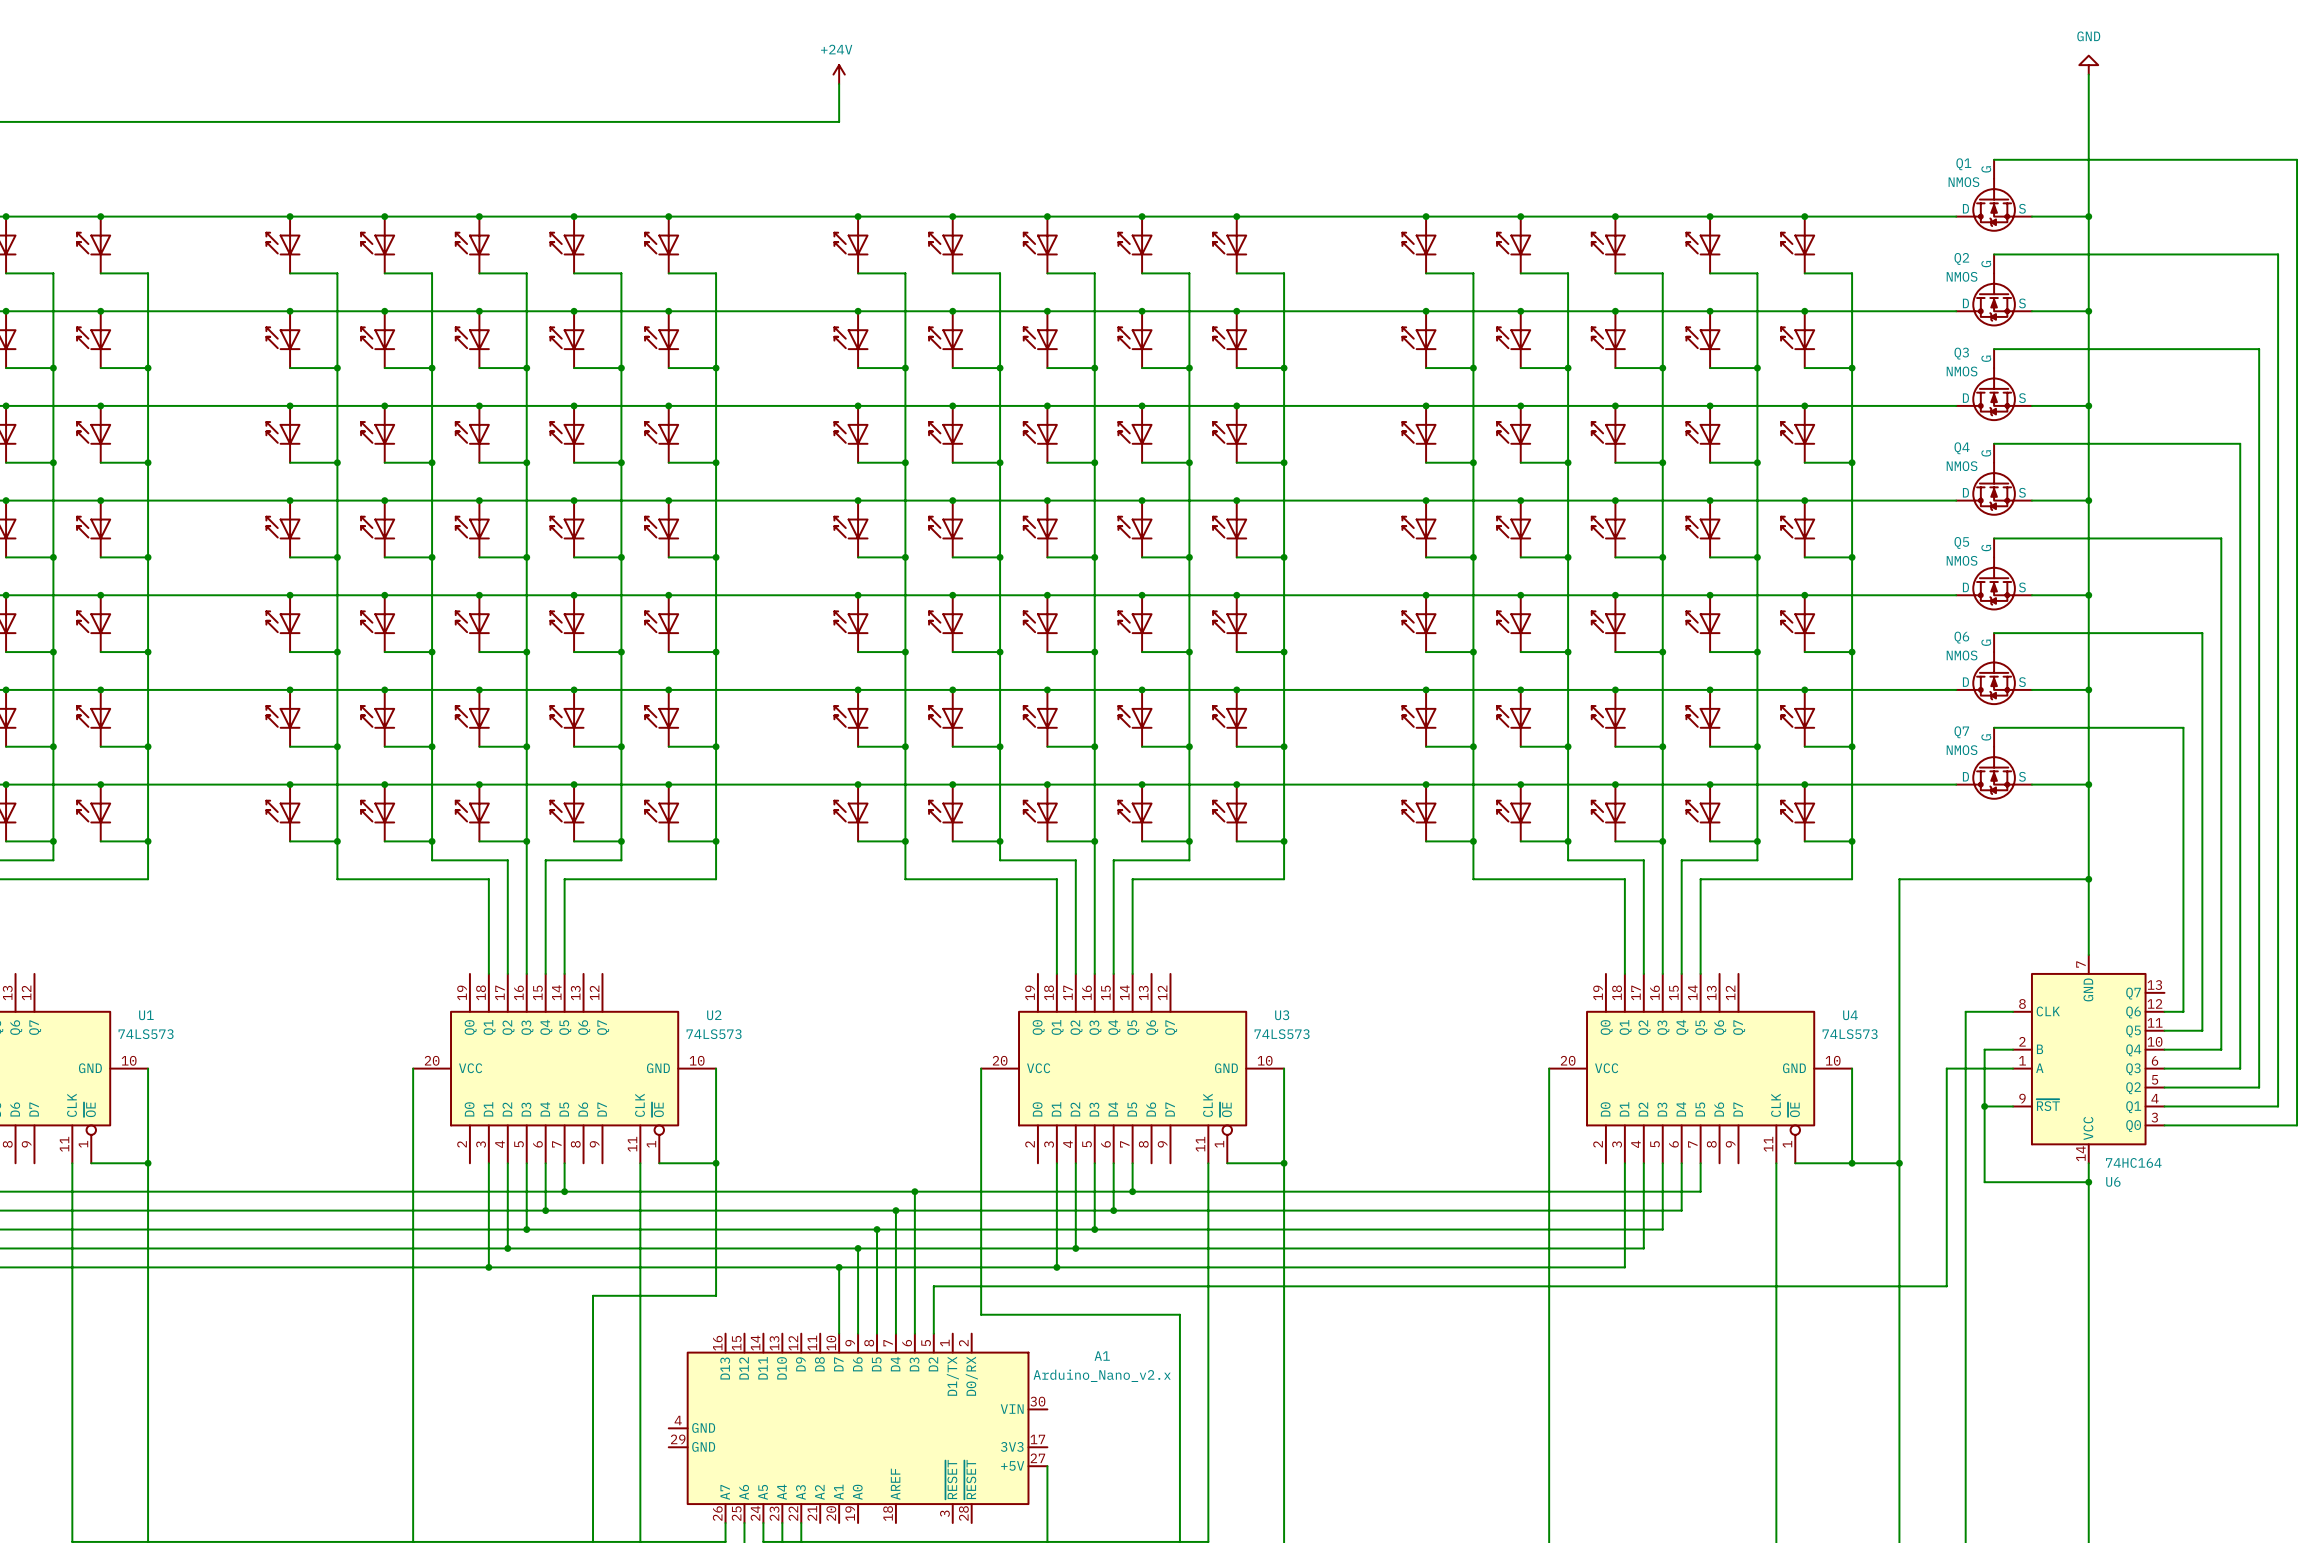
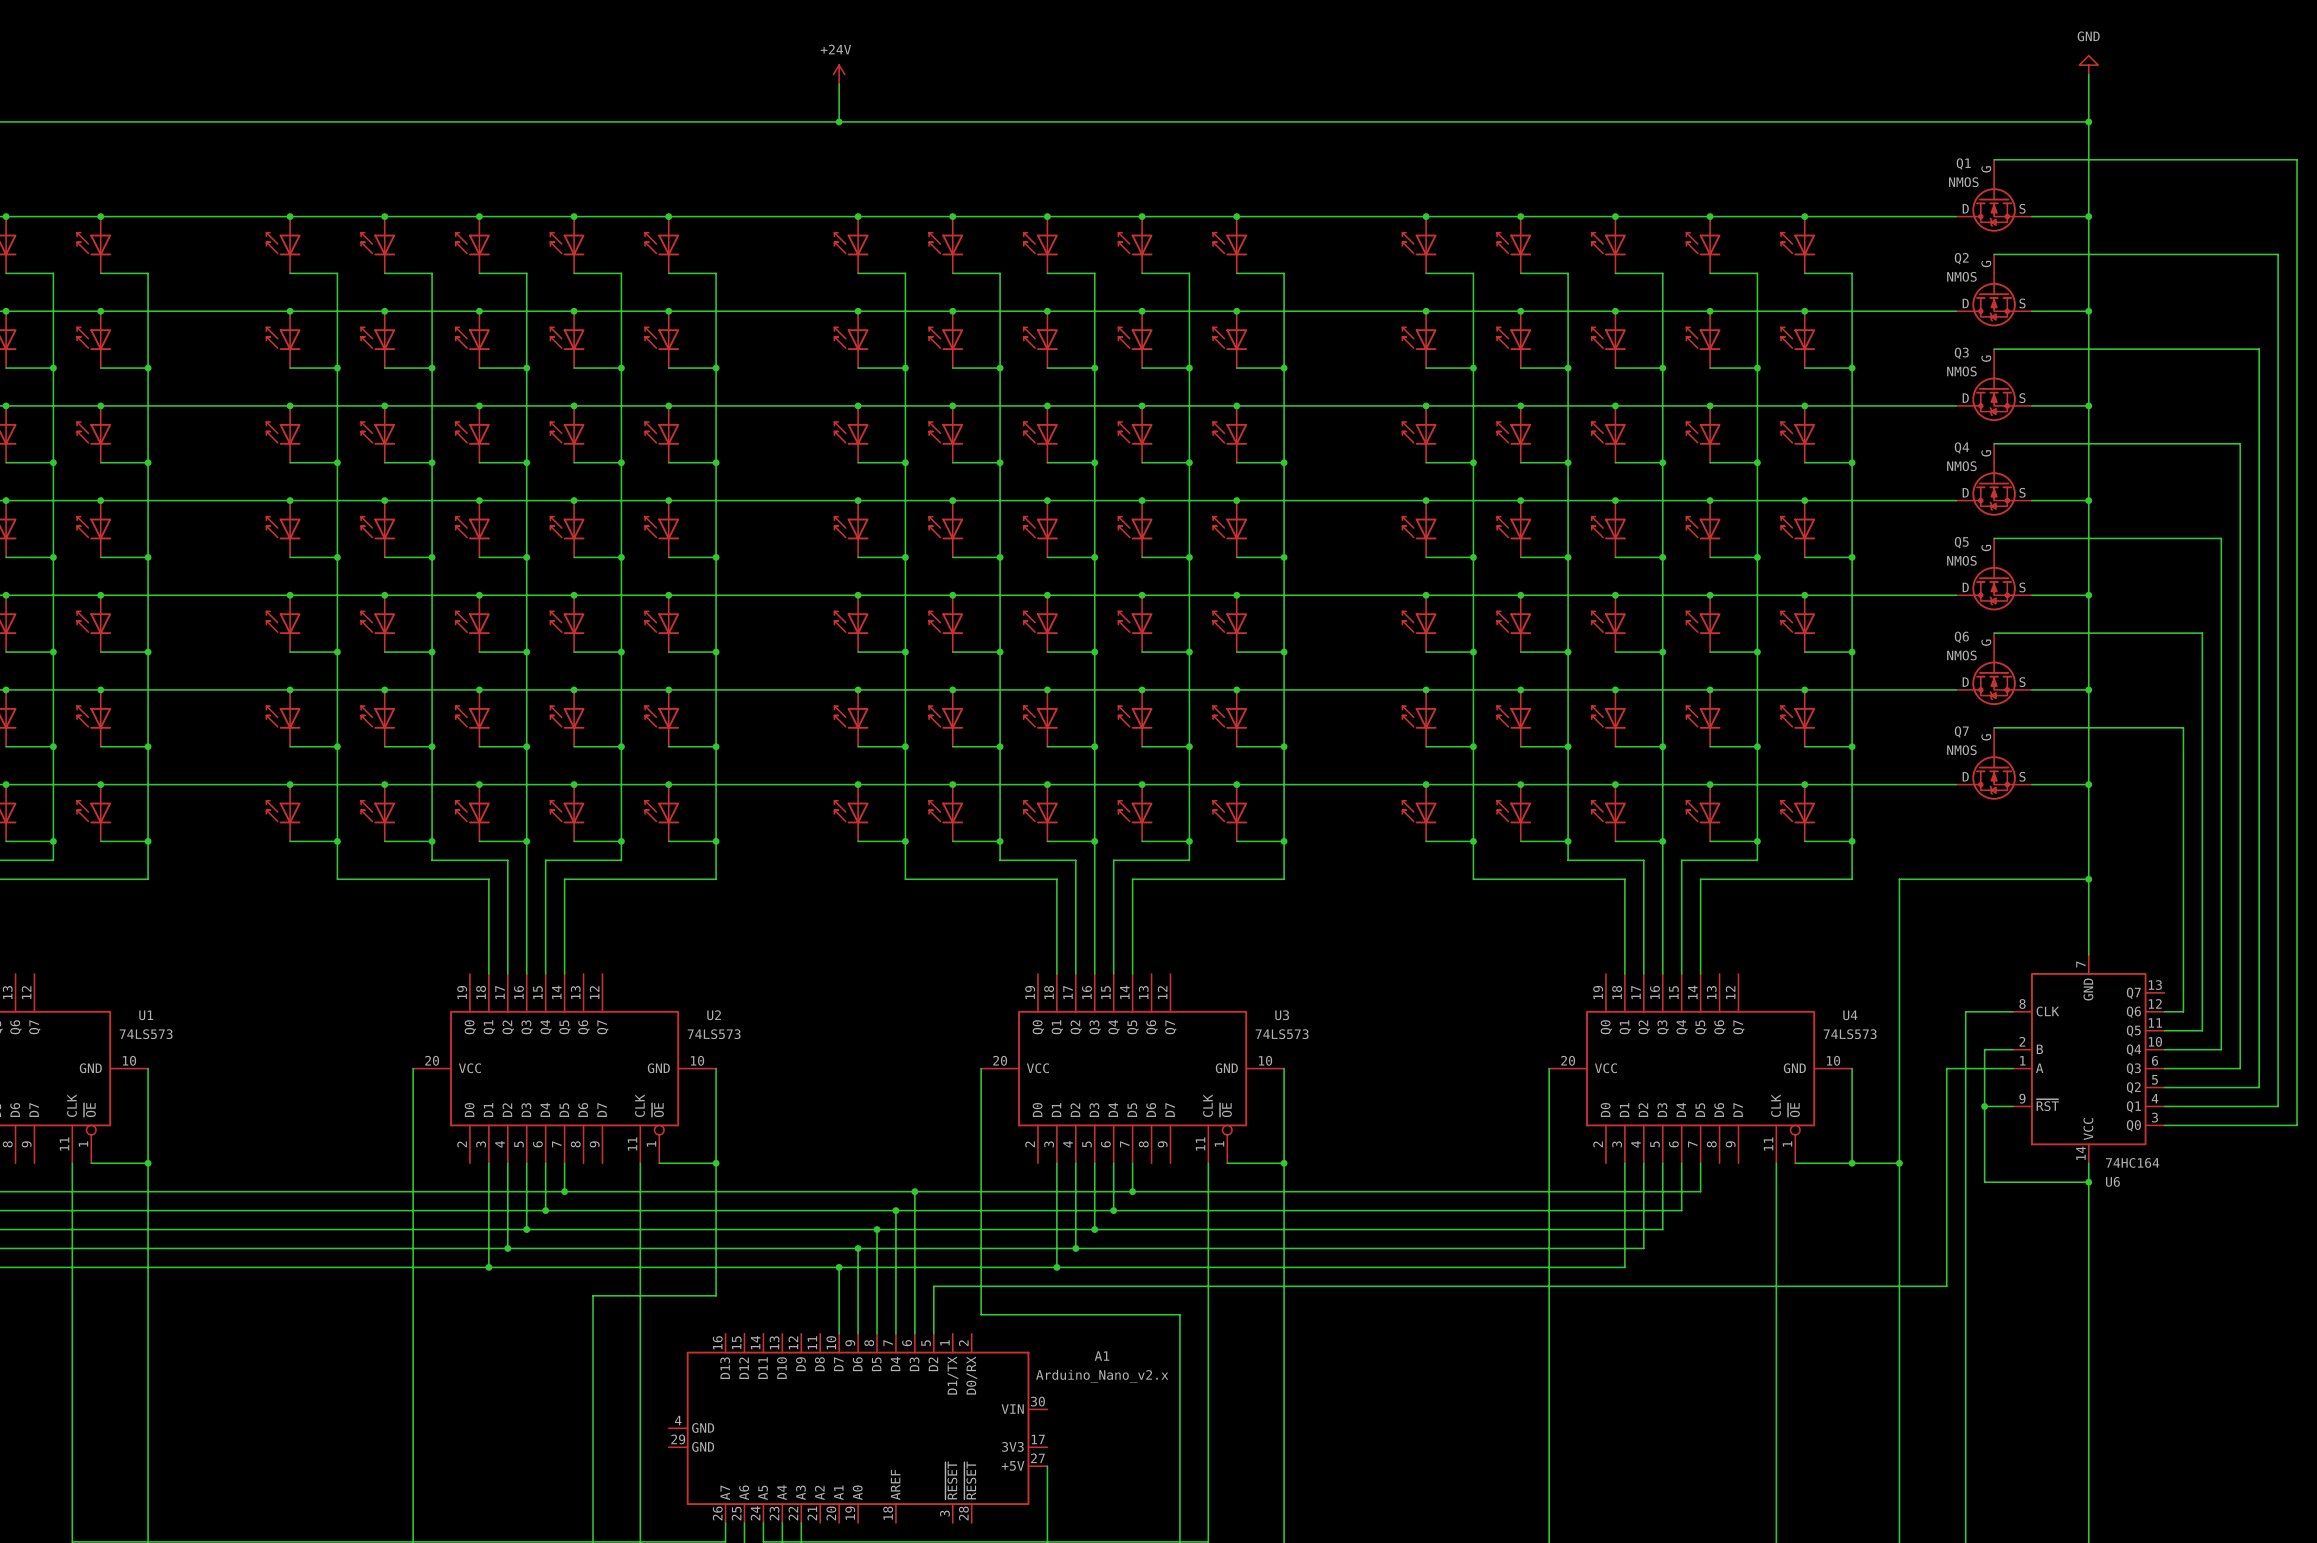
wire: none -> (839, 121) (2088, 121)
junction: none -> (839, 121)
junction: none -> (2088, 121)

